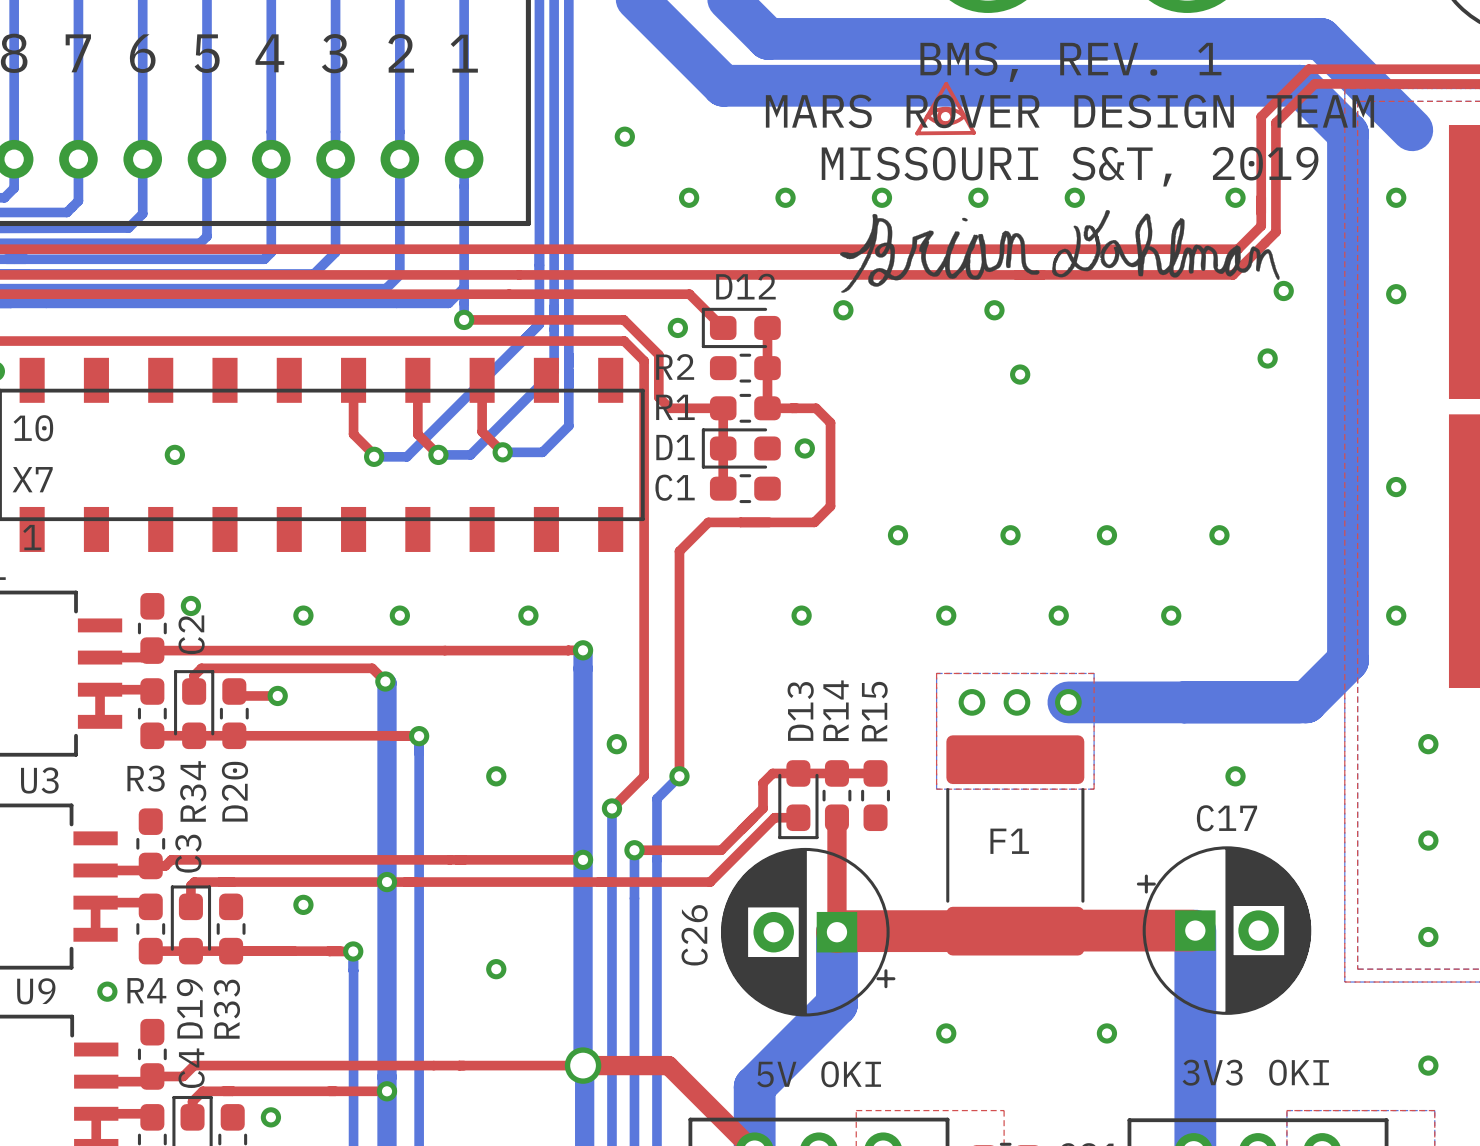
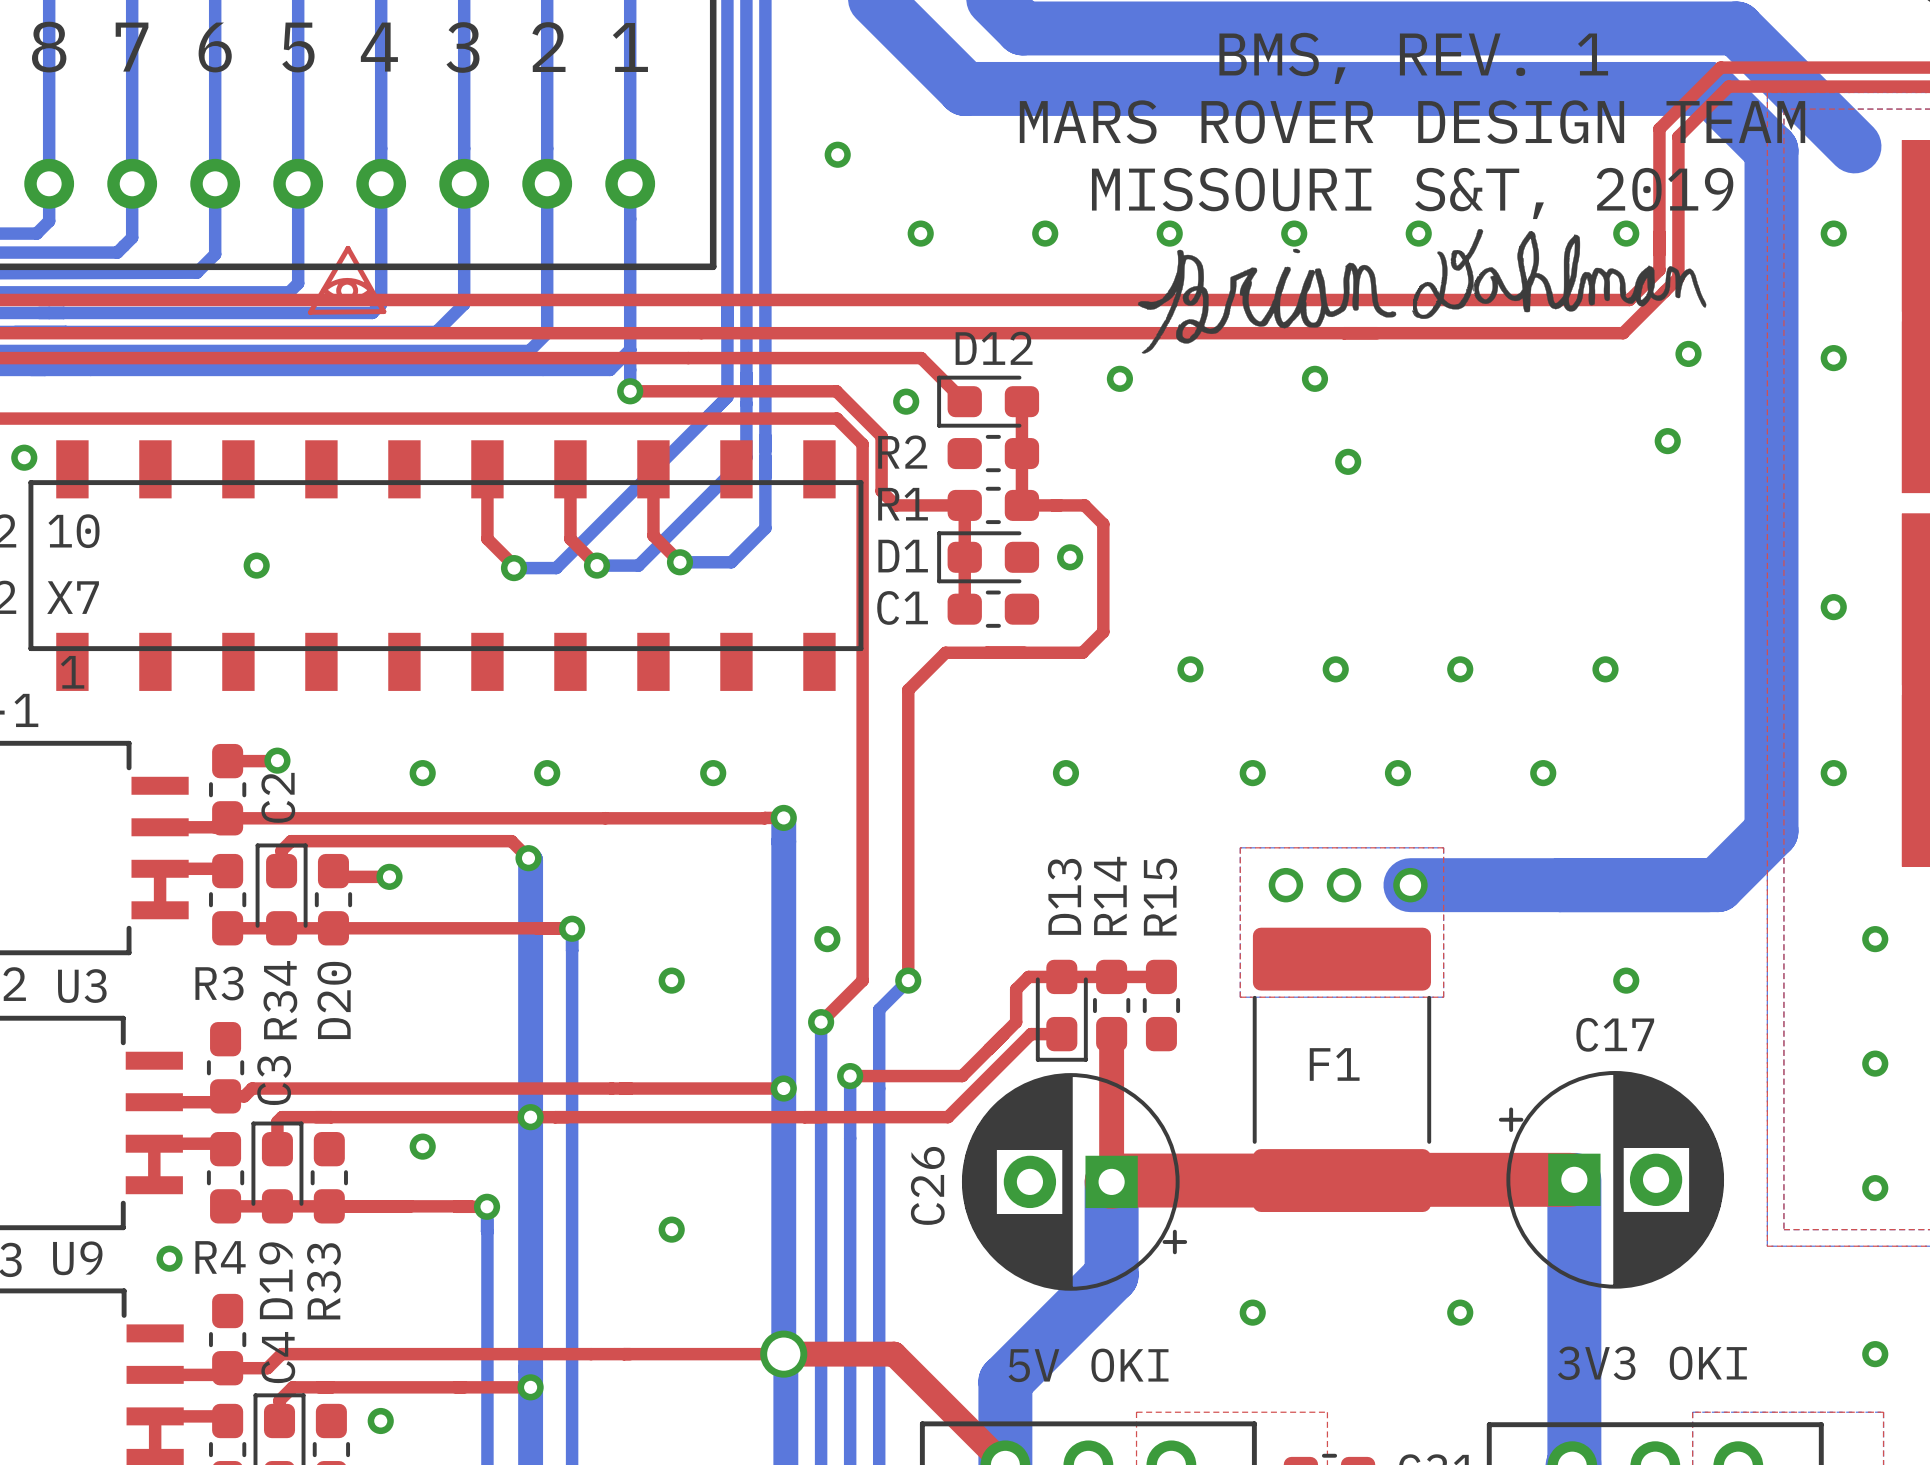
drawing: [915, 81, 976, 136] -> none
drawing: none -> [307, 245, 387, 316]
drawing shape: [839, 209, 1280, 293] -> [1137, 229, 1707, 354]
top track: none -> (235, 761) (276, 761)

